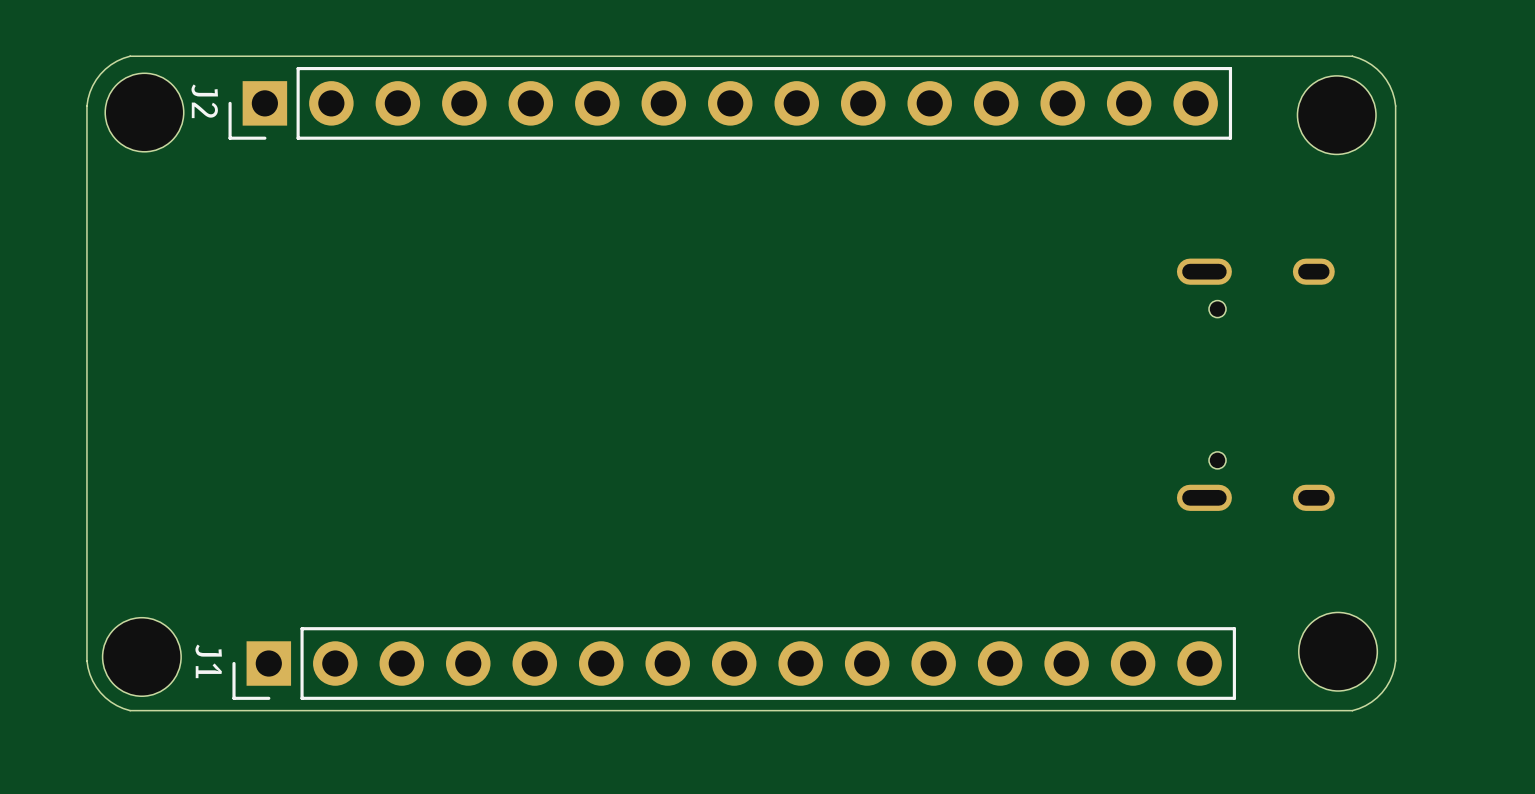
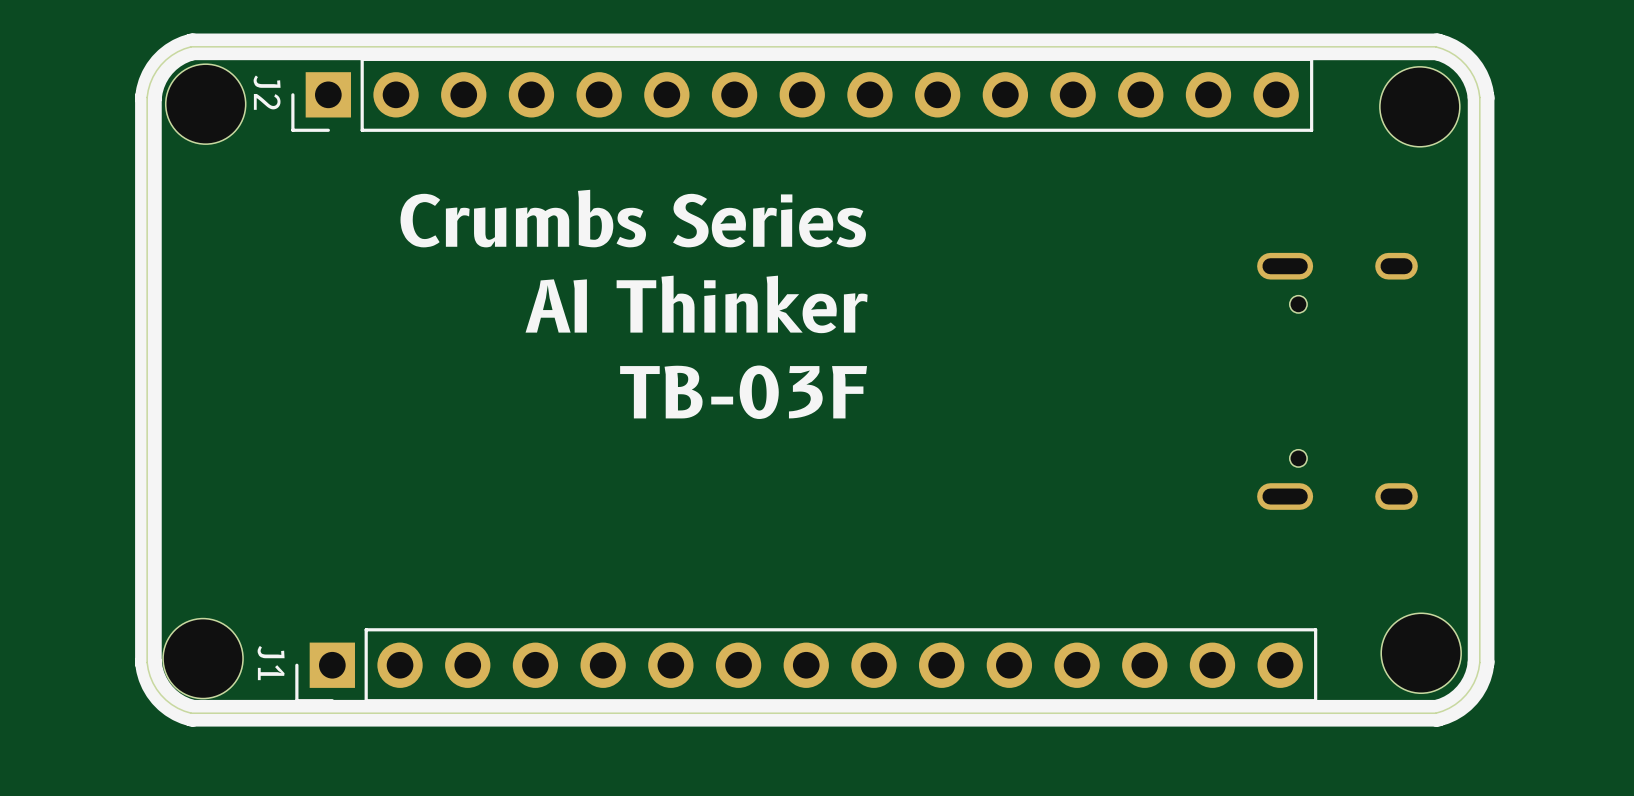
line: none -> (1437, 46) (192, 46) (179, 51) (167, 59) (157, 70) (151, 83) (148, 97) (148, 662) (154, 683) (167, 700) (179, 708) (192, 713) (1437, 713) (1450, 708) (1462, 700) (1471, 689) (1478, 676) (1481, 662) (1481, 97) (1475, 76) (1467, 65) (1456, 55) (1437, 46)
text: none -> Crumbs Series (633, 218)
text: none -> AI Thinker (696, 304)
text: none -> TB-03F (743, 392)

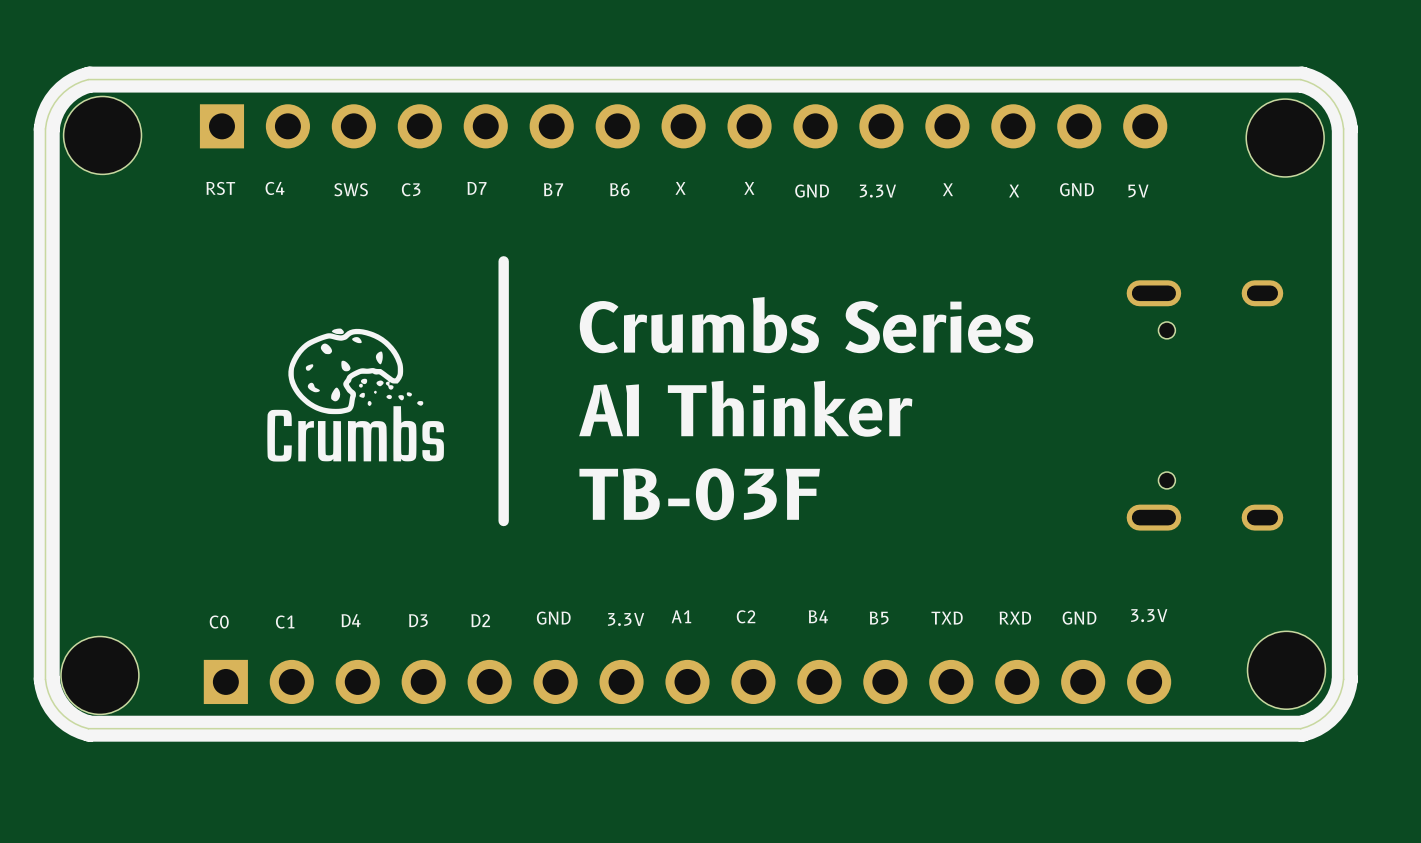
J2: (802, 94) -> none
text: none -> RST (220, 188)
text: none -> C4 (275, 188)
text: none -> D7 (477, 188)
text: none -> X (680, 188)
text: none -> X (749, 188)
text: none -> SWS (351, 189)
text: none -> C3 (411, 189)
text: none -> B7 (553, 189)
text: none -> B6 (619, 189)
text: none -> X (947, 189)
text: none -> GND (1076, 189)
text: none -> GND (812, 191)
text: none -> 3.3V (877, 191)
text: none -> X (1014, 190)
text: none -> 5V (1138, 191)
text position: Crumbs Series (633, 218) -> Crumbs Series (806, 325)
line: none -> (503, 261) (503, 520)
drawing: none -> [267, 328, 445, 462]
text position: AI Thinker (696, 304) -> AI Thinker (745, 408)
text position: TB-03F (743, 392) -> TB-03F (699, 494)
text: none -> 3.3V (1149, 615)
text: none -> A1 (681, 616)
text: none -> C2 (746, 616)
text: none -> B4 (818, 616)
text: none -> GND (553, 618)
text: none -> B5 (879, 618)
text: none -> TXD (947, 618)
text: none -> RXD (1015, 618)
text: none -> GND (1079, 618)
text: none -> 3.3V (626, 619)
text: none -> D4 (351, 620)
text: none -> D3 (418, 620)
text: none -> D2 (480, 620)
text: none -> C0 (219, 622)
text: none -> C1 (285, 622)
J1: (806, 665) -> none

